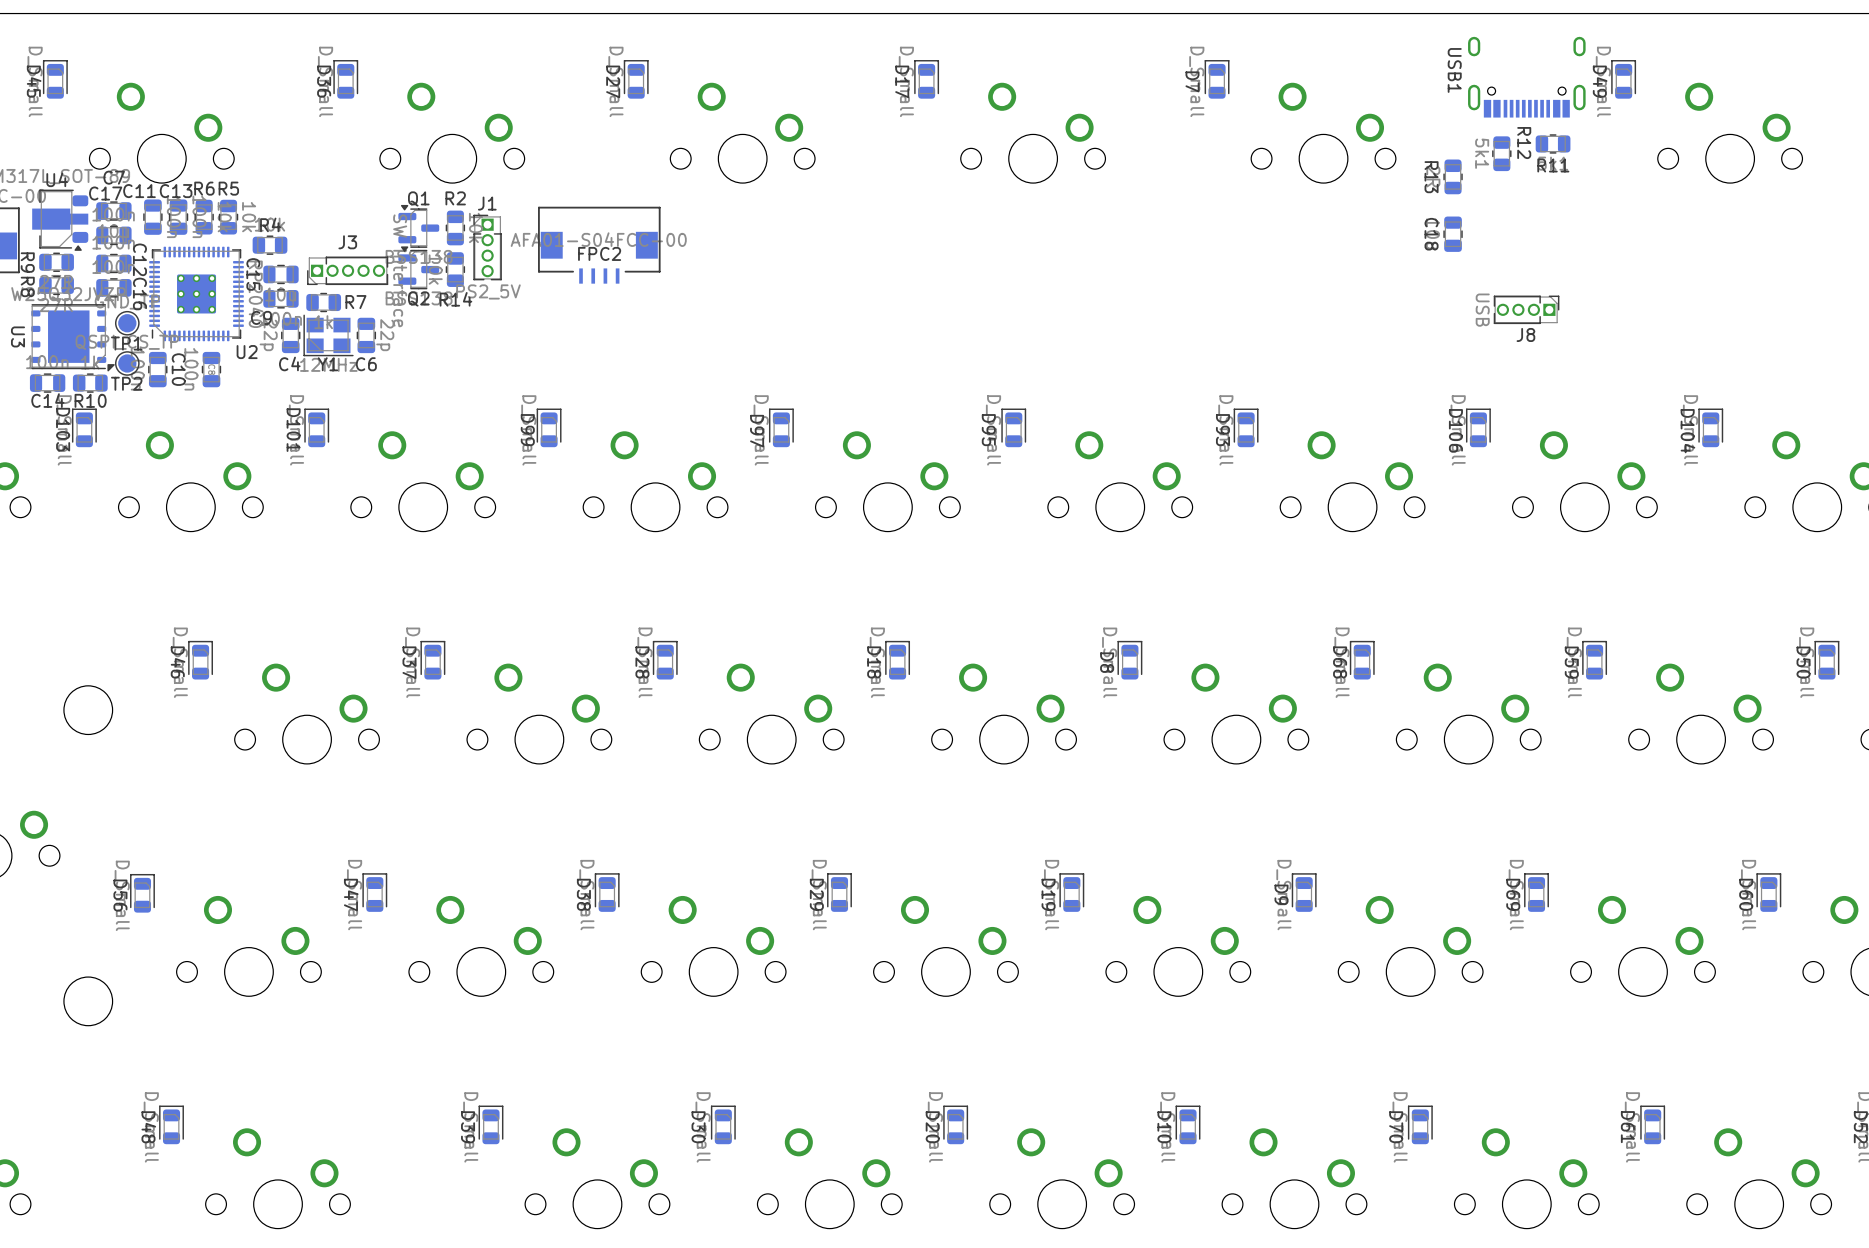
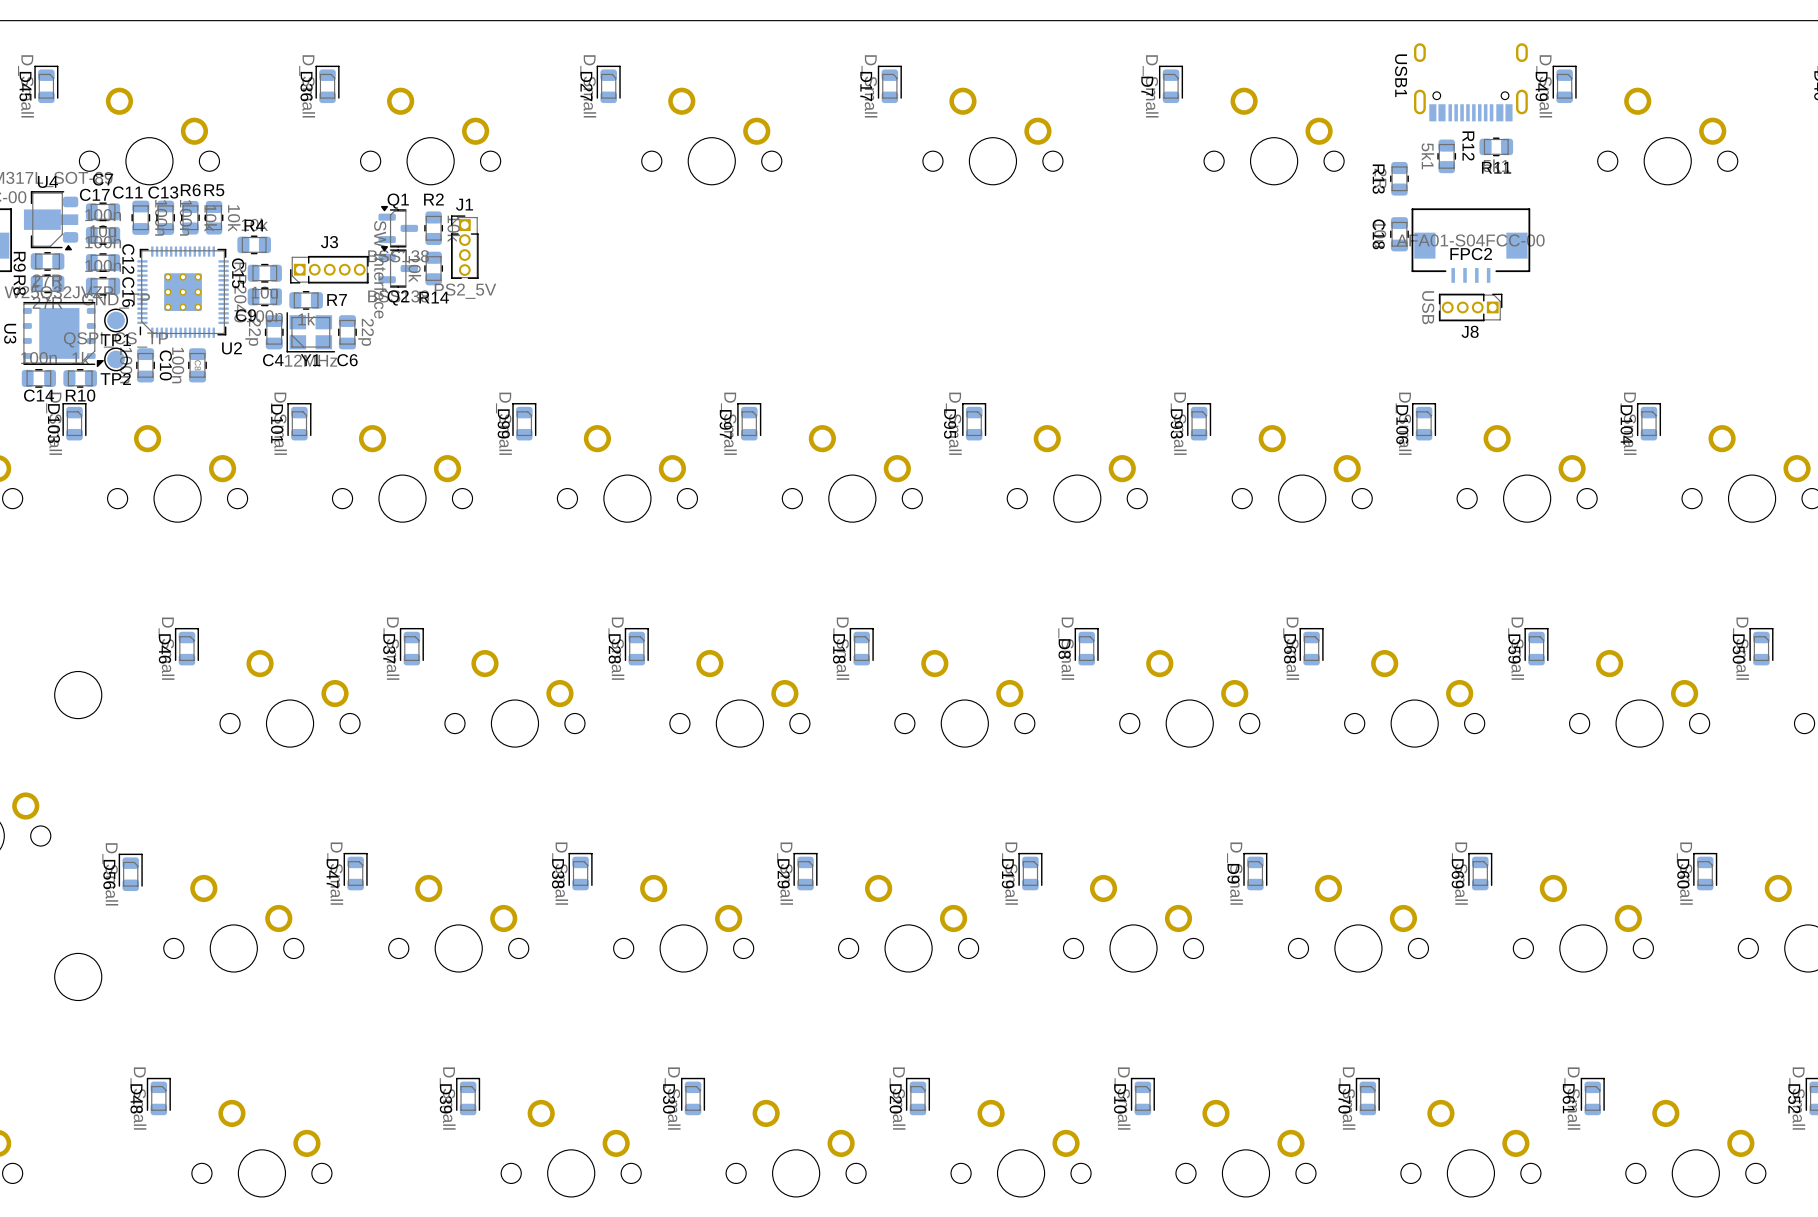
FPC2 position: (599, 245) -> (1470, 245)

